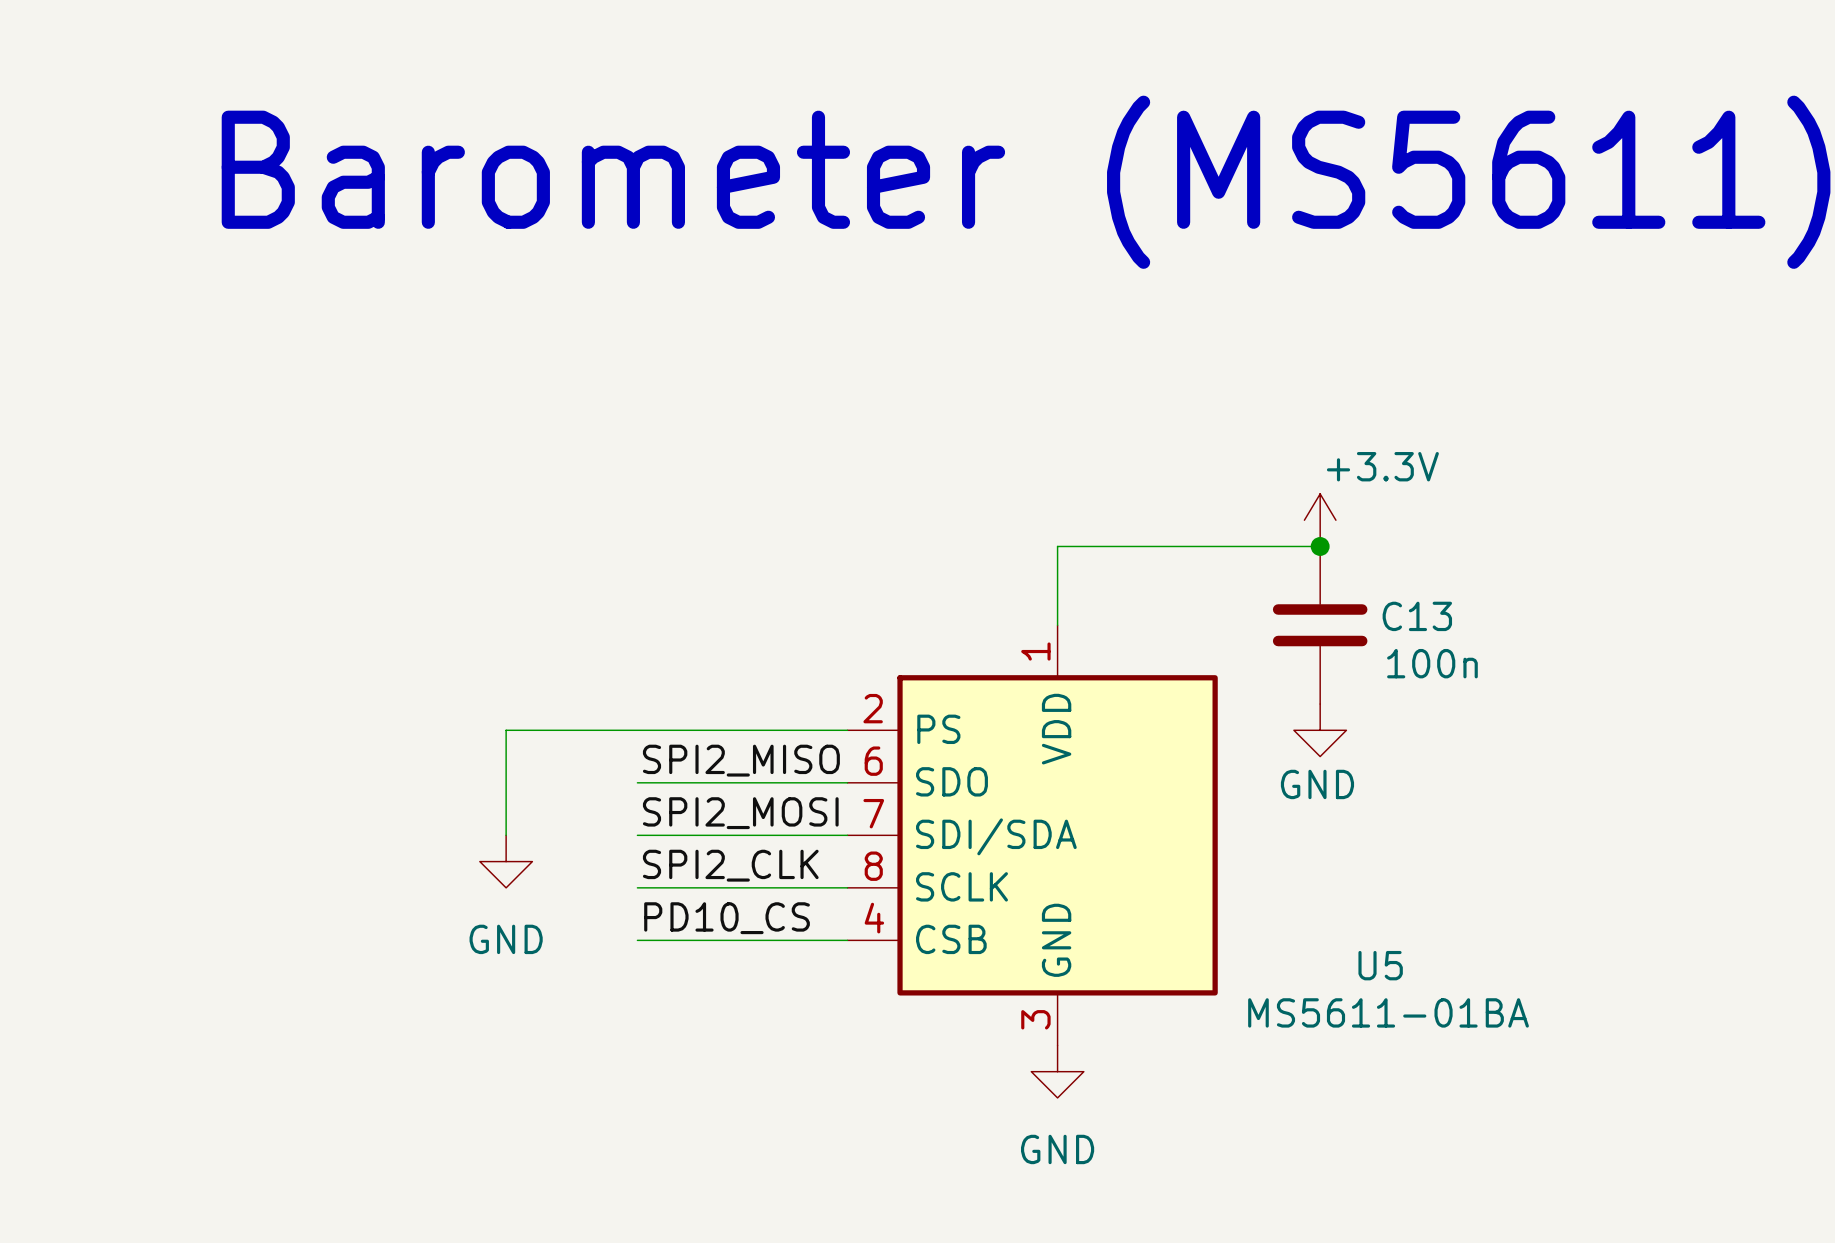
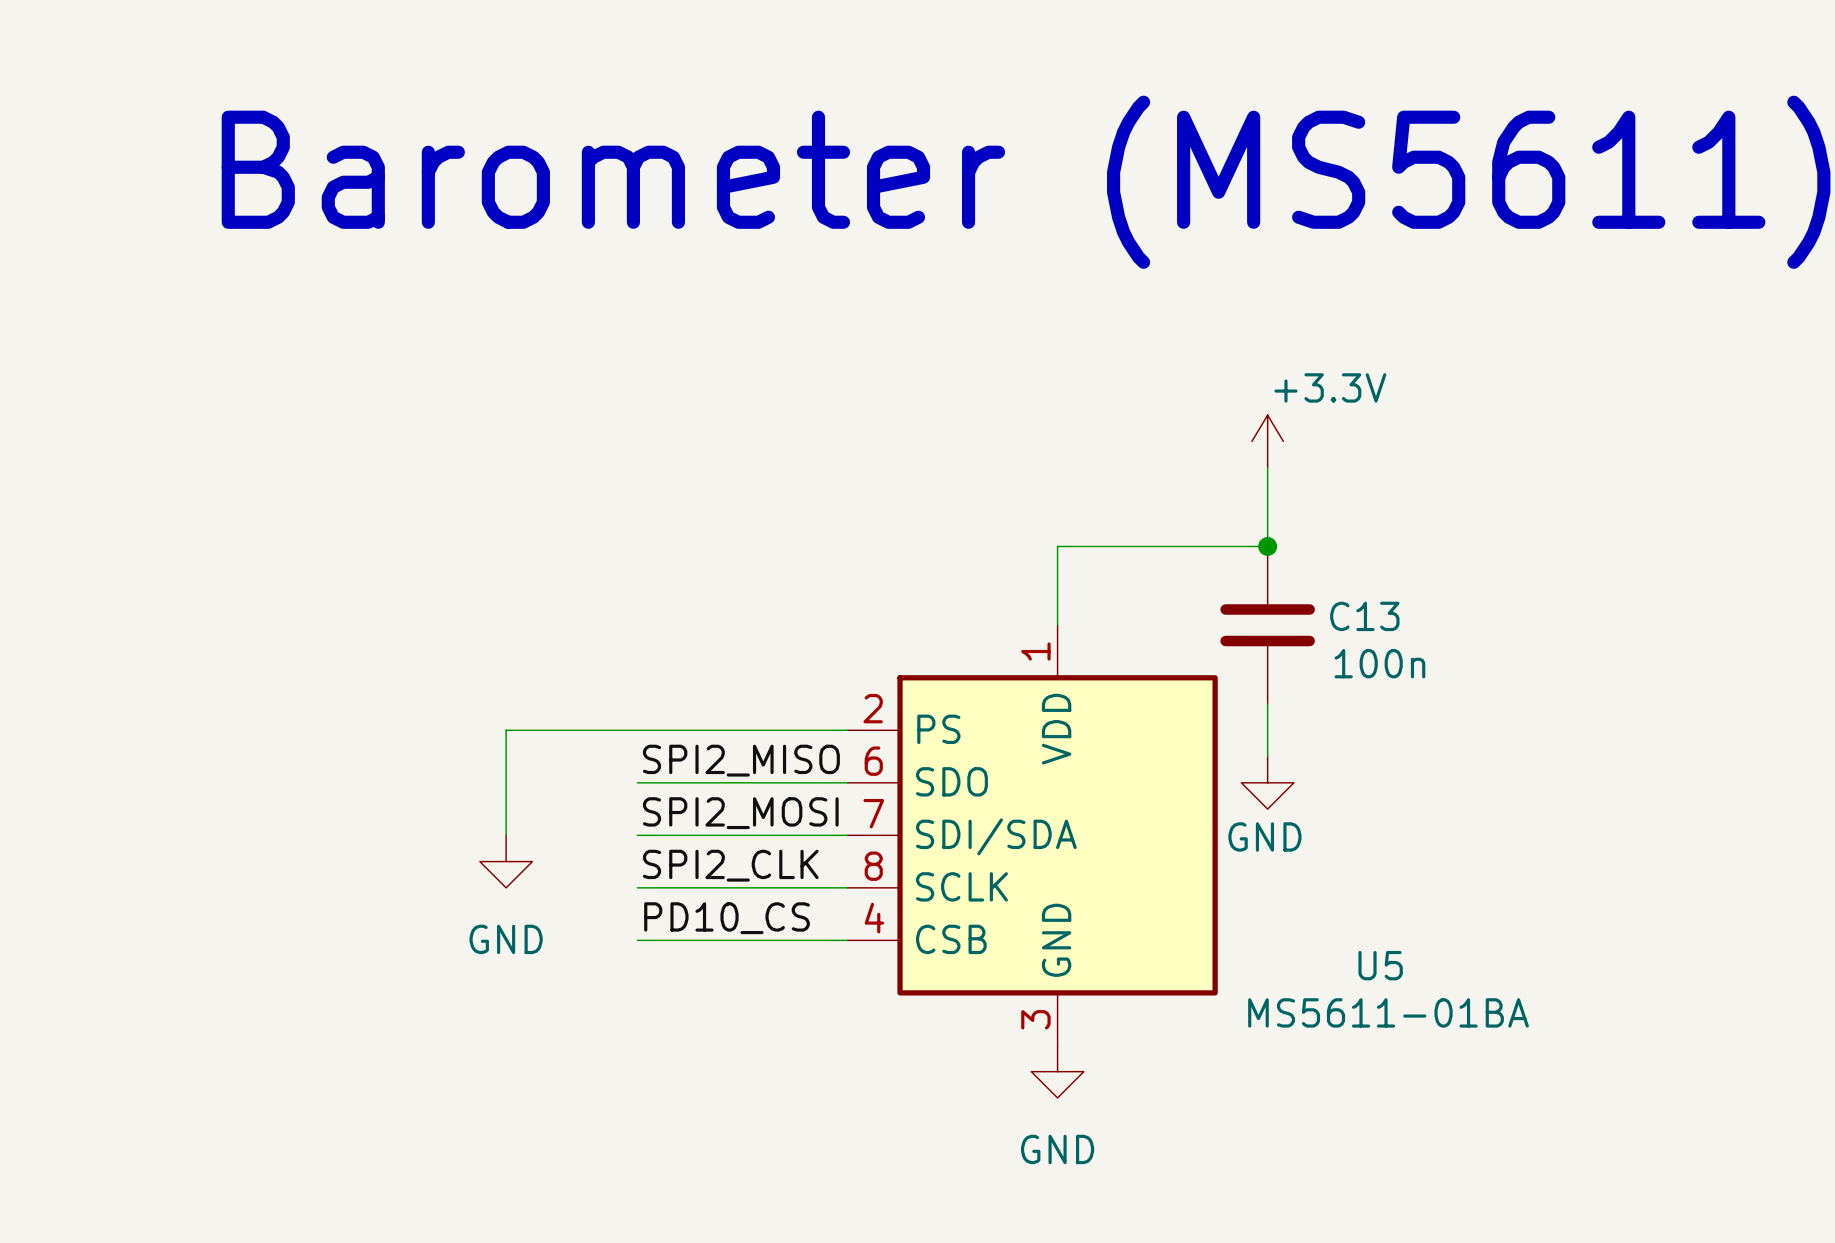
power symbol position: +3.3V (1320, 520) -> +3.3V (1267, 441)
wire: (1267, 546) (1320, 546) -> (1267, 546) (1267, 467)
junction position: (1320, 546) -> (1267, 546)
C13 position: (1320, 625) -> (1267, 625)
wire: none -> (1267, 704) (1267, 756)
power symbol position: GND (1320, 730) -> GND (1267, 782)

